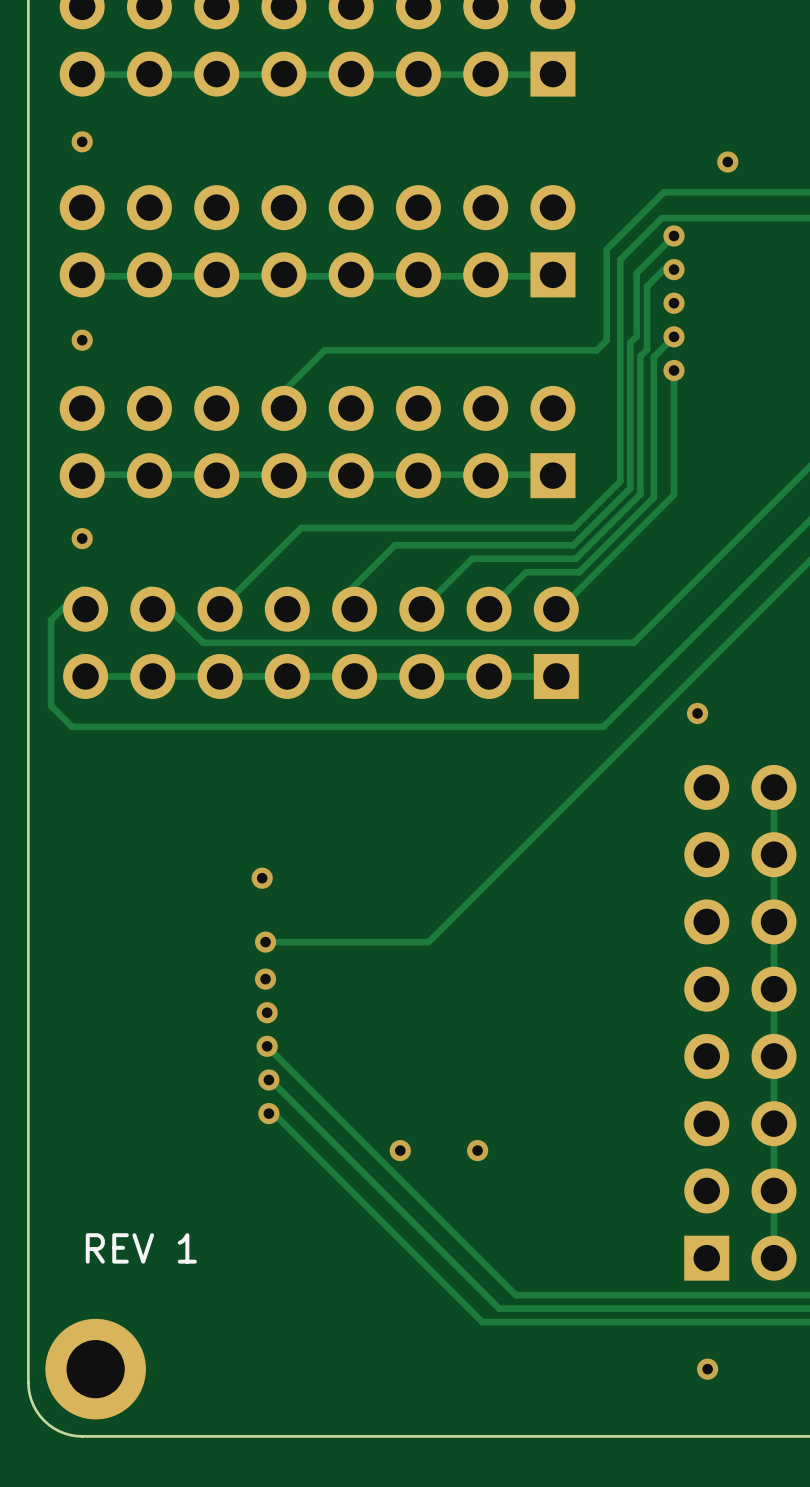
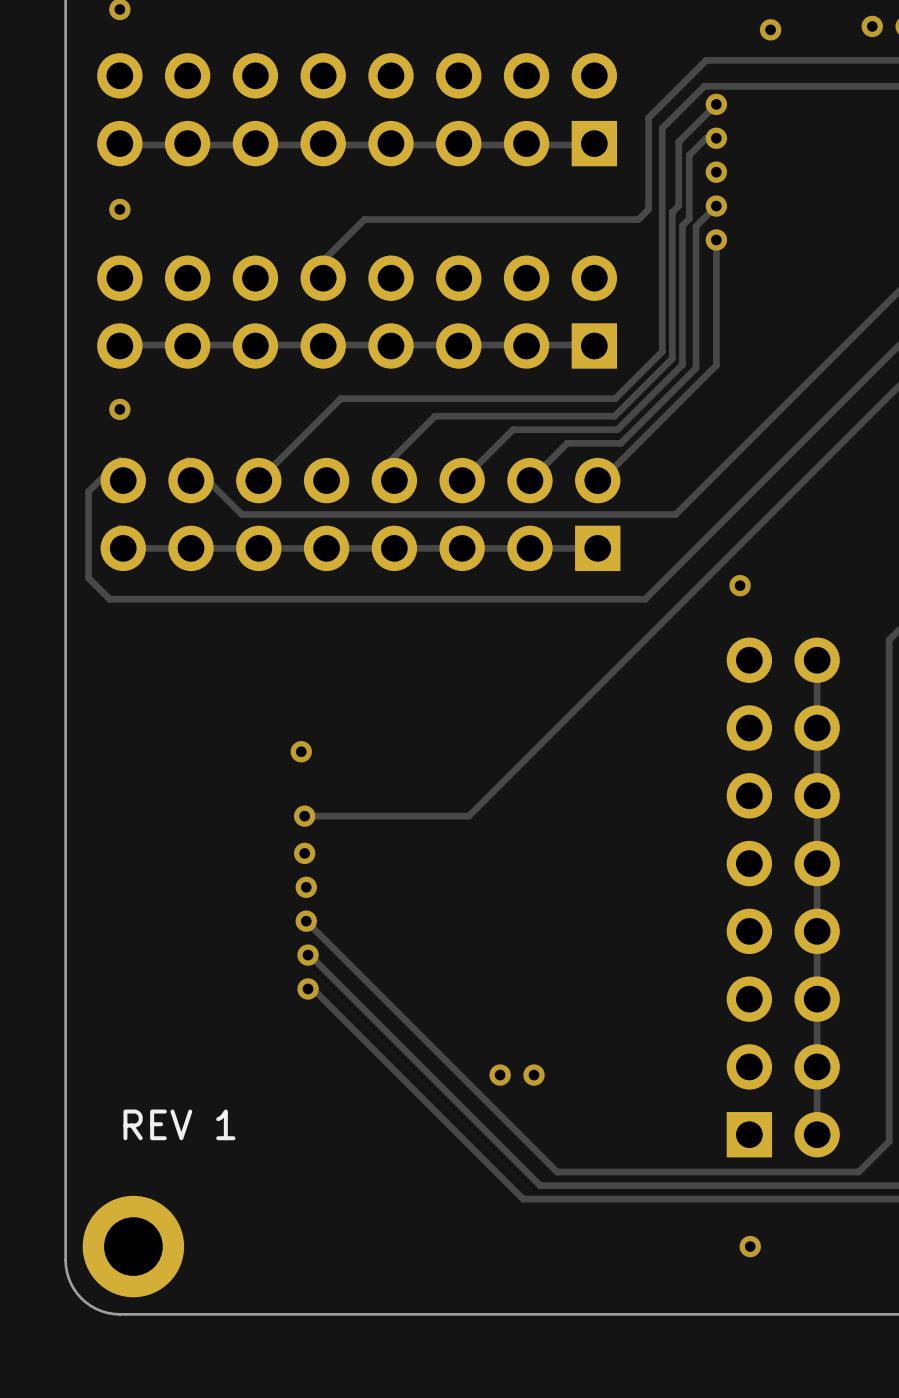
via: (400, 1150) -> none
via: (477, 1150) -> none
via: none -> (500, 1075)
via: none -> (534, 1075)

